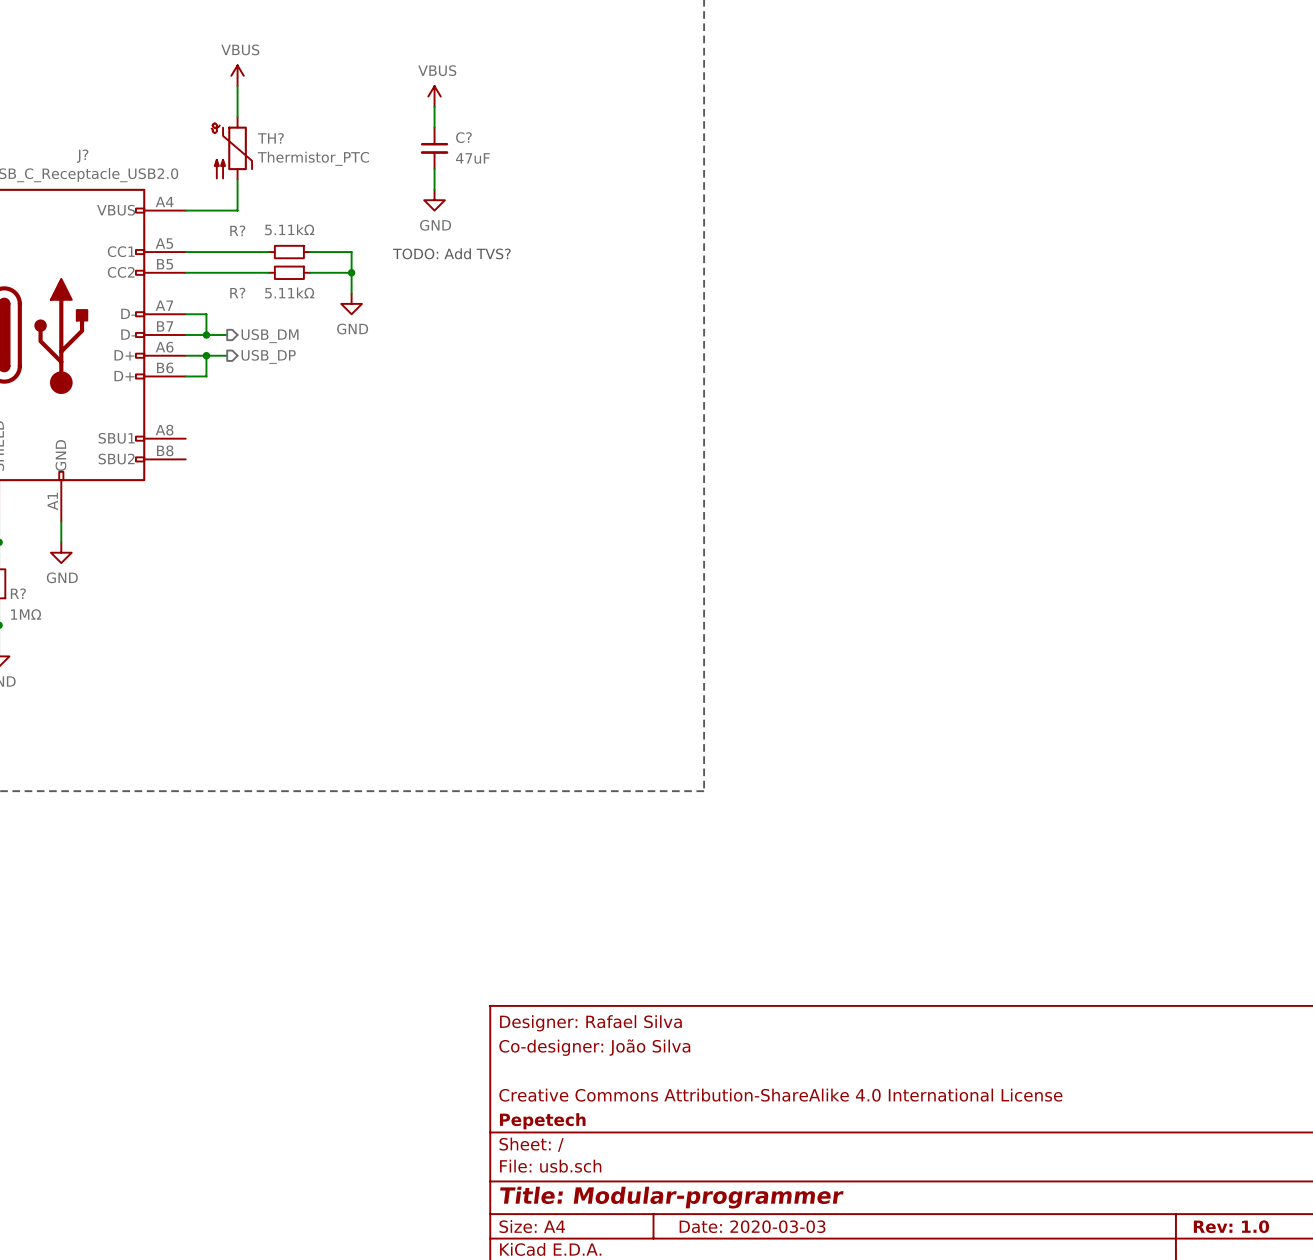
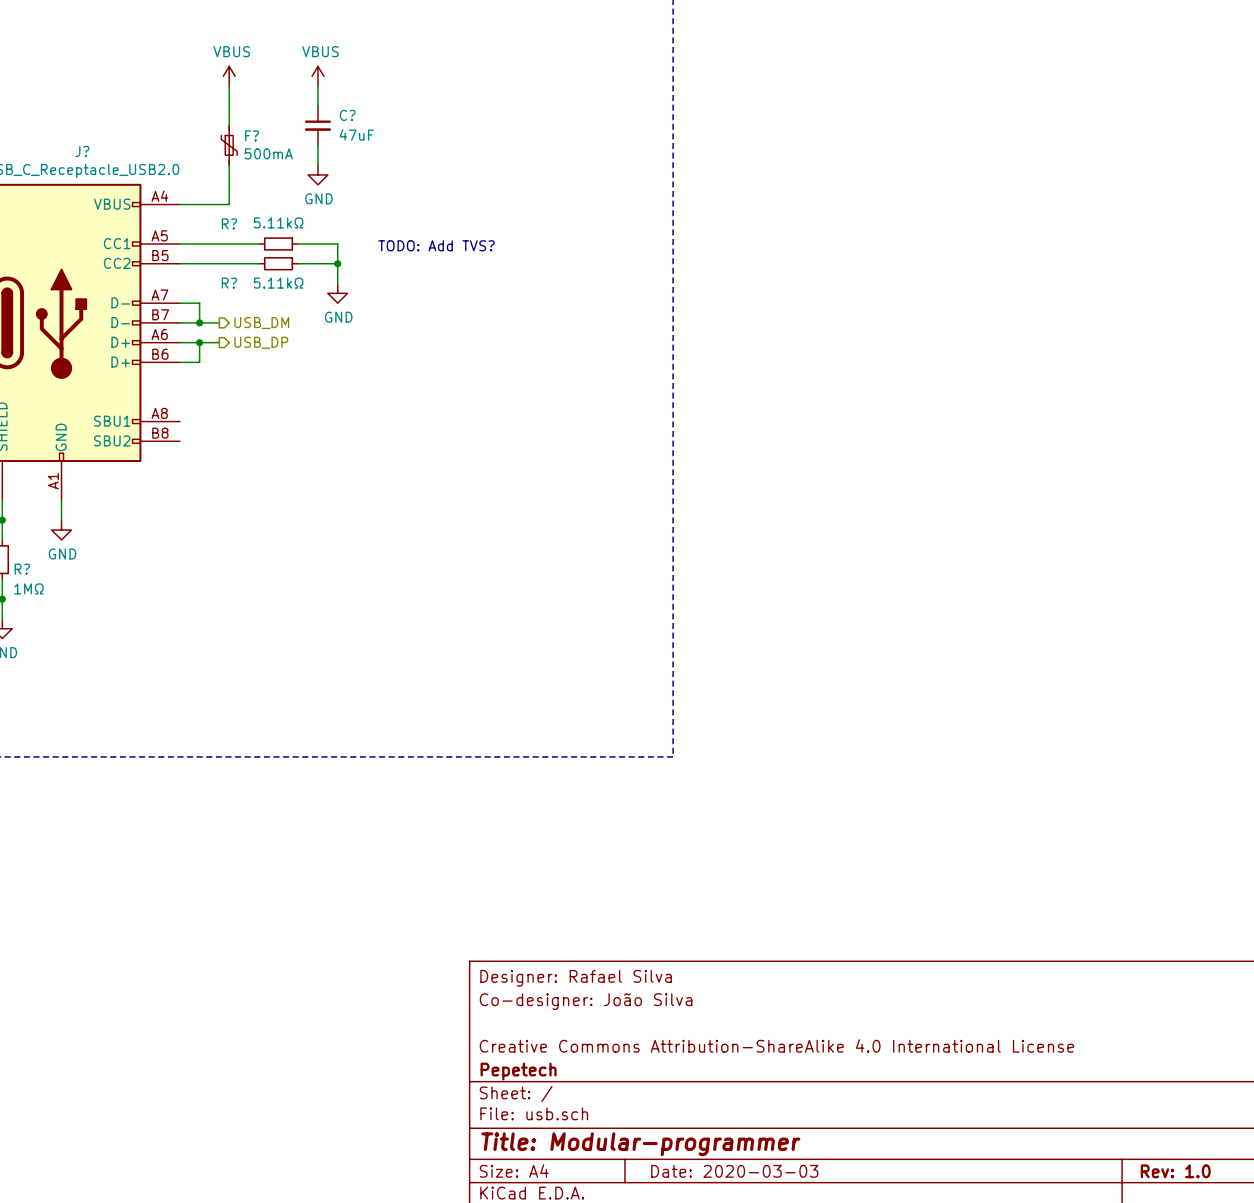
power symbol position: VBUS (434, 96) -> VBUS (317, 76)
wire: (434, 106) (434, 127) -> (317, 86) (317, 105)
TH?: Thermistor_PTC (231, 148) -> none
F?: none -> 500mA (229, 145)
C? position: (434, 148) -> (317, 125)
wire: (434, 169) (434, 189) -> (317, 145) (317, 165)
power symbol position: GND (434, 200) -> GND (317, 174)

